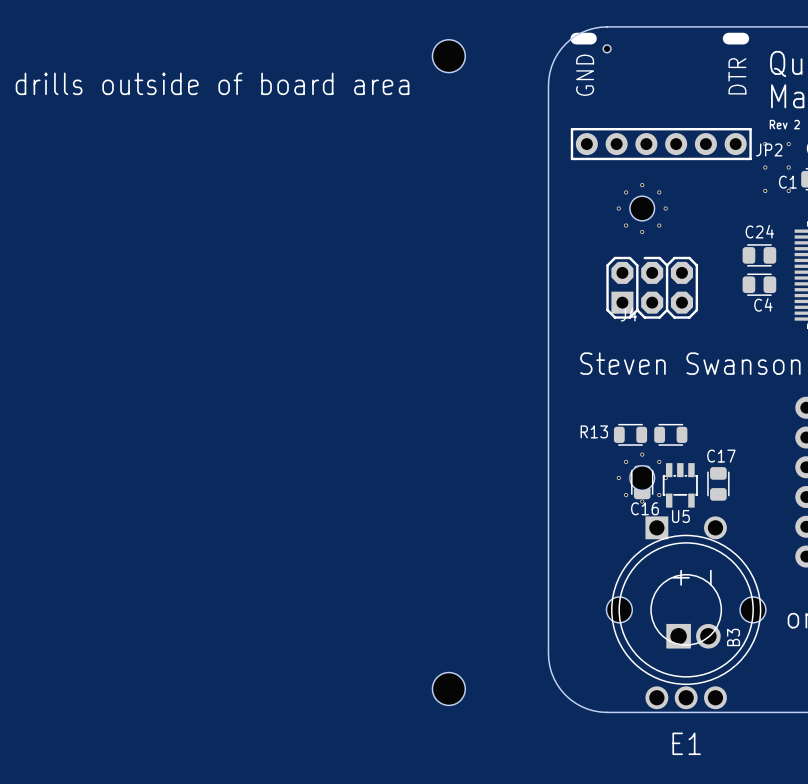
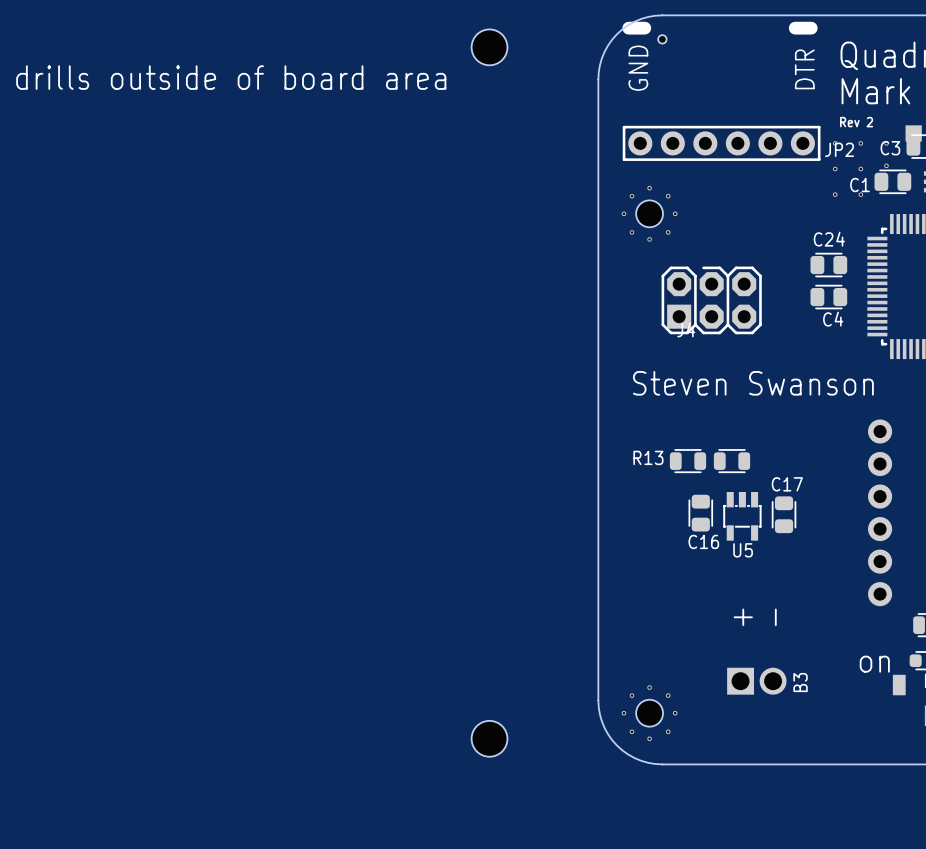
part position: (642, 208) -> (649, 213)
part: (642, 478) -> none
E1: (686, 612) -> none
part: none -> (649, 713)

